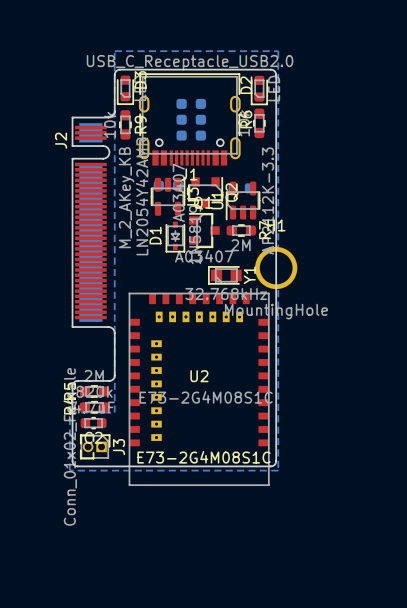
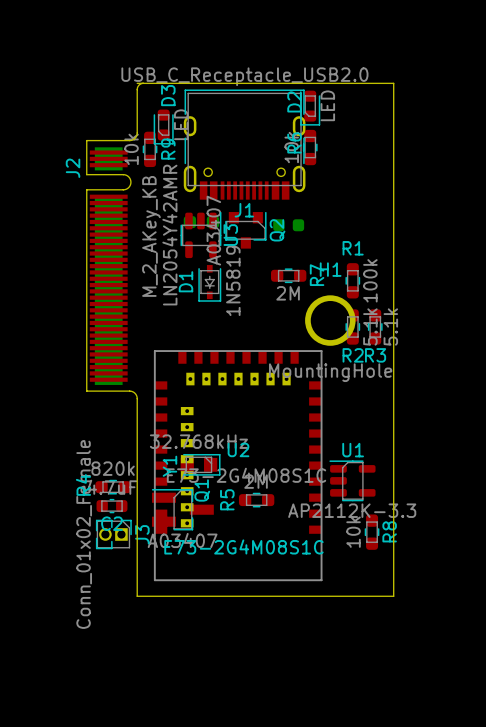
bottom zone outline: (114, 51) (114, 412) (69, 412) (69, 470) (278, 470) (278, 51) (114, 51) -> none
board edge: (270, 69) (274, 71) (276, 74) (275, 463) (270, 466) (75, 465) (72, 461) (72, 384) (77, 380) (110, 380) (114, 375) -> (324, 83) (393, 83) (393, 596) (137, 596) (137, 449)
D3 position: (125, 90) -> (163, 127)
R3 side: bottom (191, 103) -> top (375, 326)
J1 position: (189, 119) -> (244, 144)
R1 side: bottom (191, 119) -> top (352, 280)
R2 side: bottom (191, 135) -> top (352, 326)
U1 rotation: 0° (243, 200) -> 90° clockwise (352, 480)
U1 position: (243, 200) -> (352, 480)
Q1 footprint: [189, 213, 220, 248] -> [151, 489, 214, 531]
Y1 rotation: 0° (224, 275) -> 180° (200, 464)
Y1 position: (224, 275) -> (200, 464)
R5 position: (94, 391) -> (256, 500)
R8: none -> 10k (372, 532)

